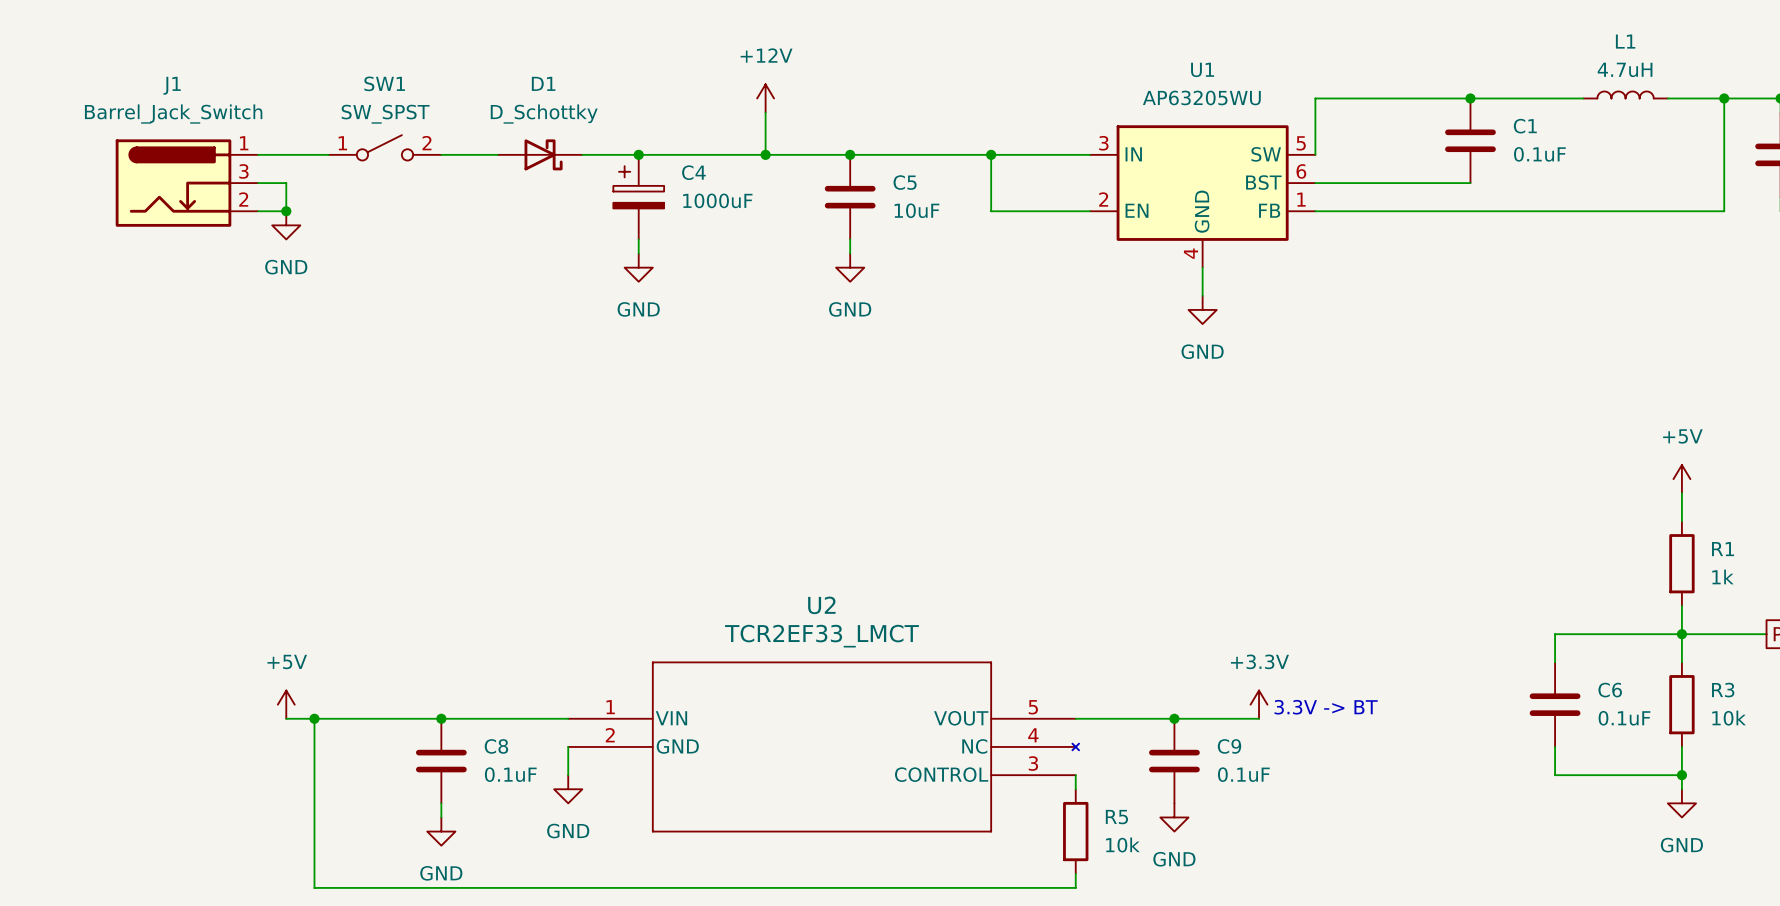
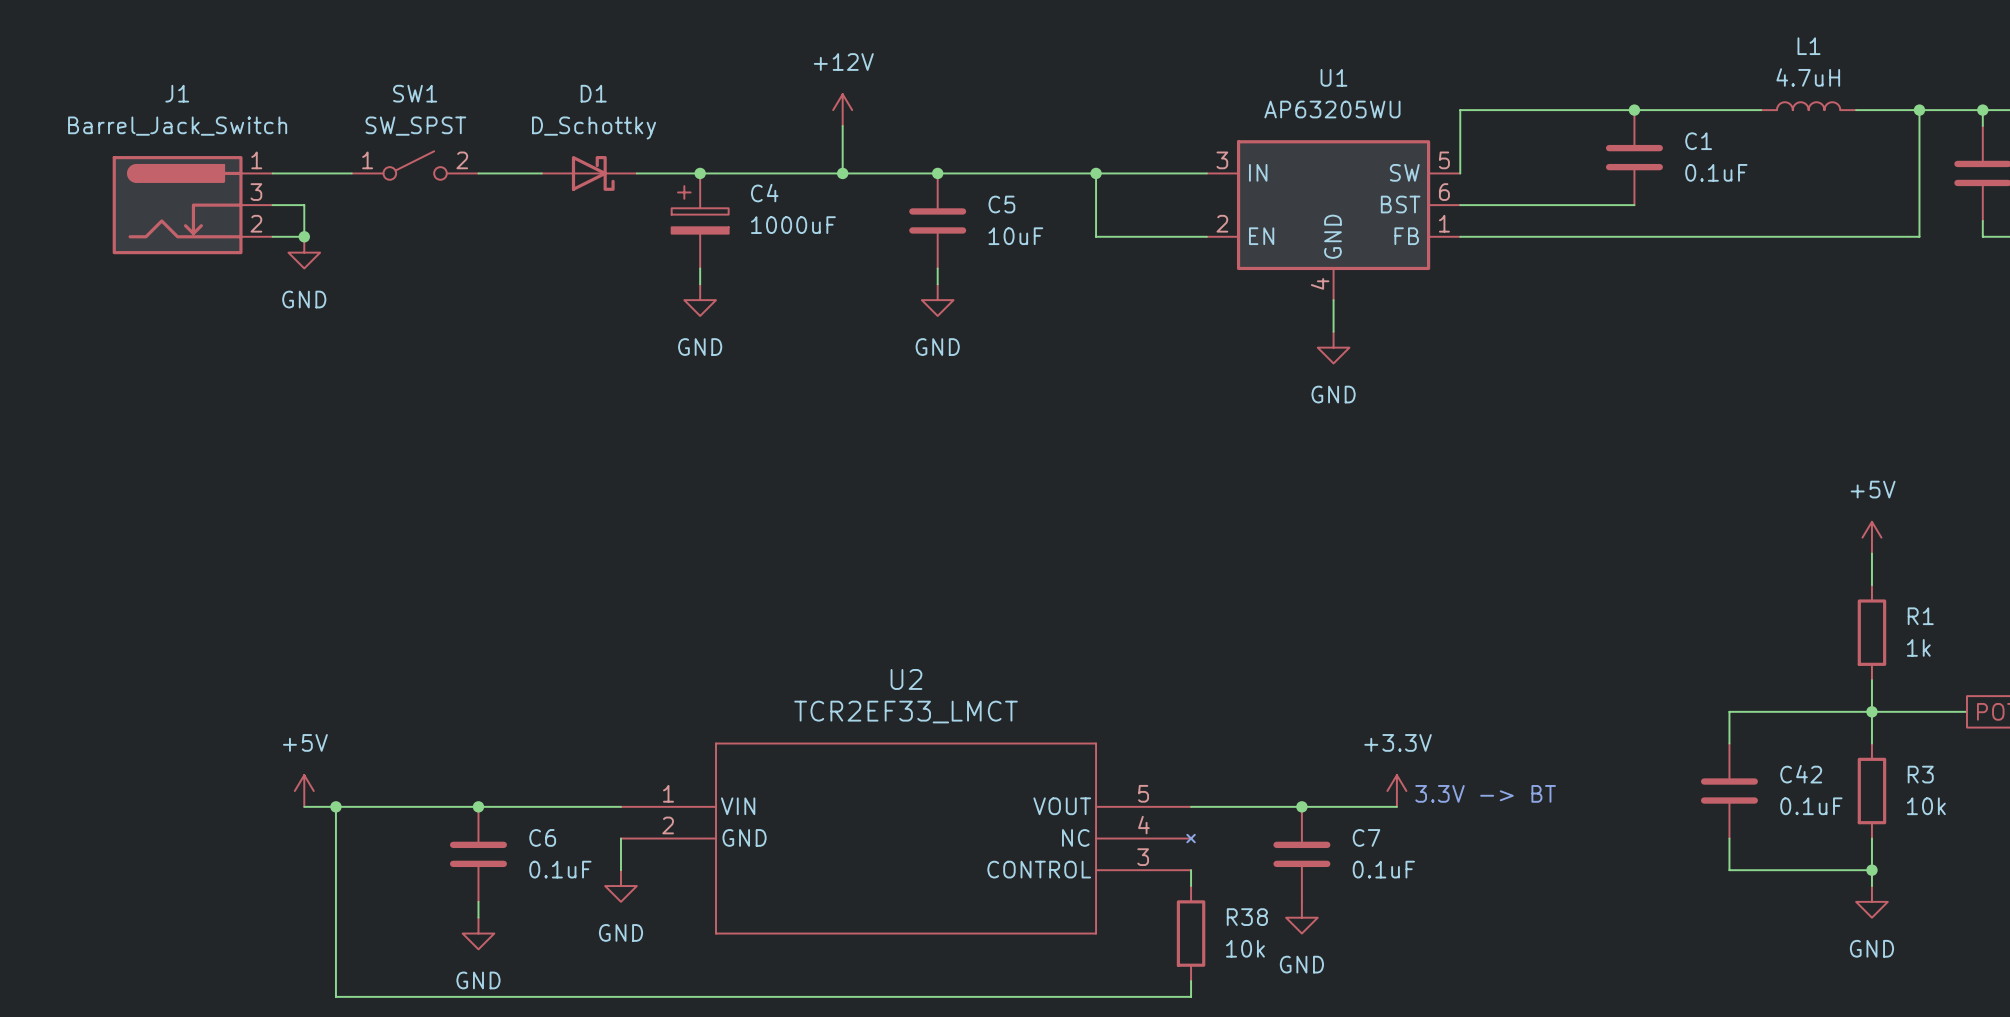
C6 name: C6 (1610, 690) -> C42 (1801, 774)
C8 name: C8 (496, 746) -> C6 (542, 837)
C9 name: C9 (1229, 746) -> C7 (1366, 837)
R5 name: R5 (1116, 817) -> R38 (1247, 917)

